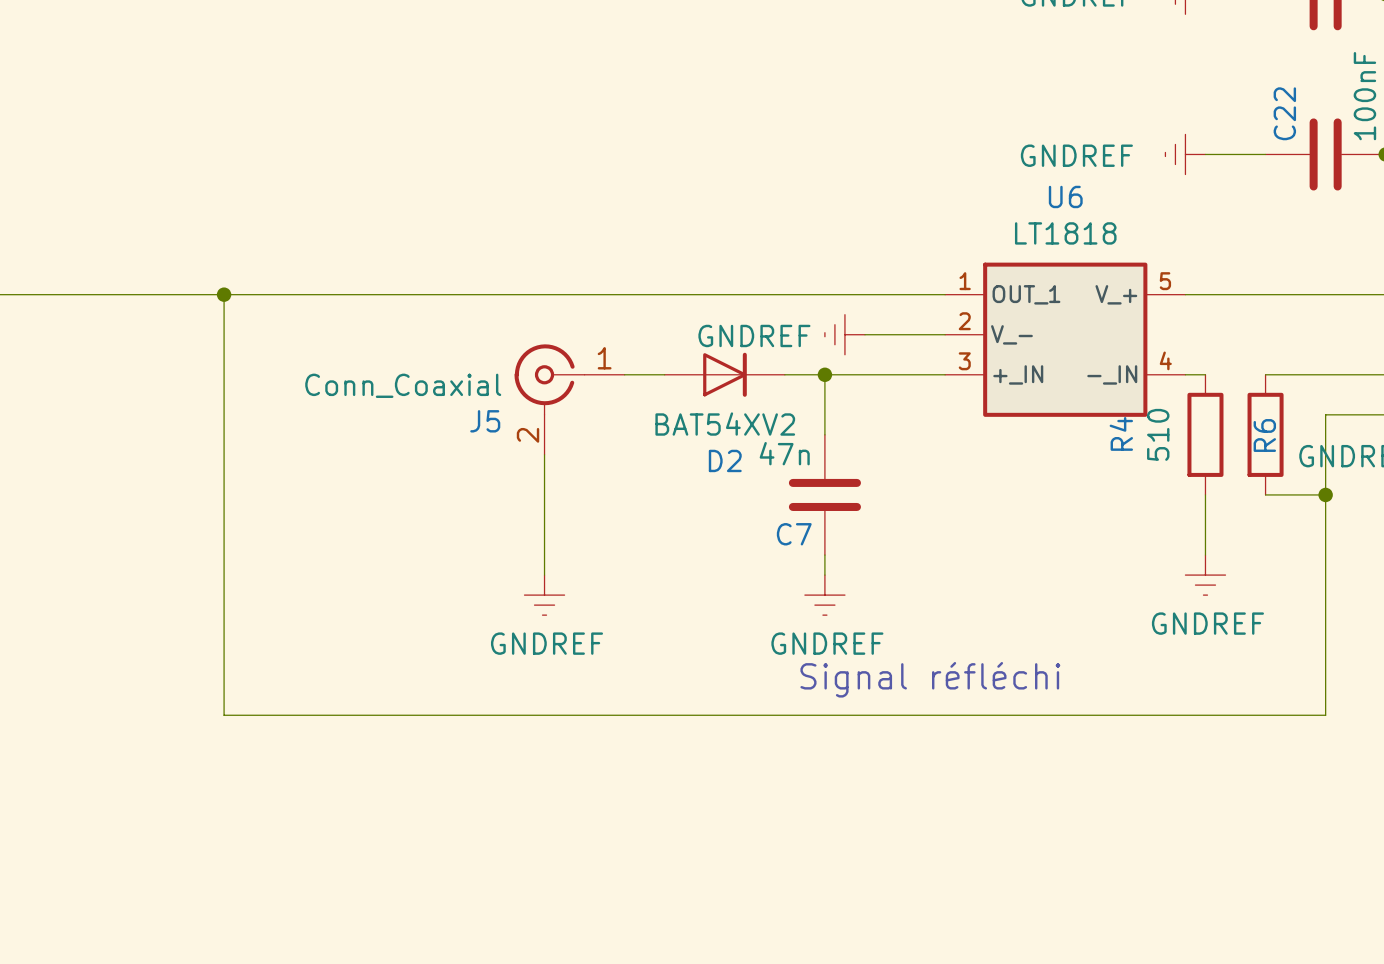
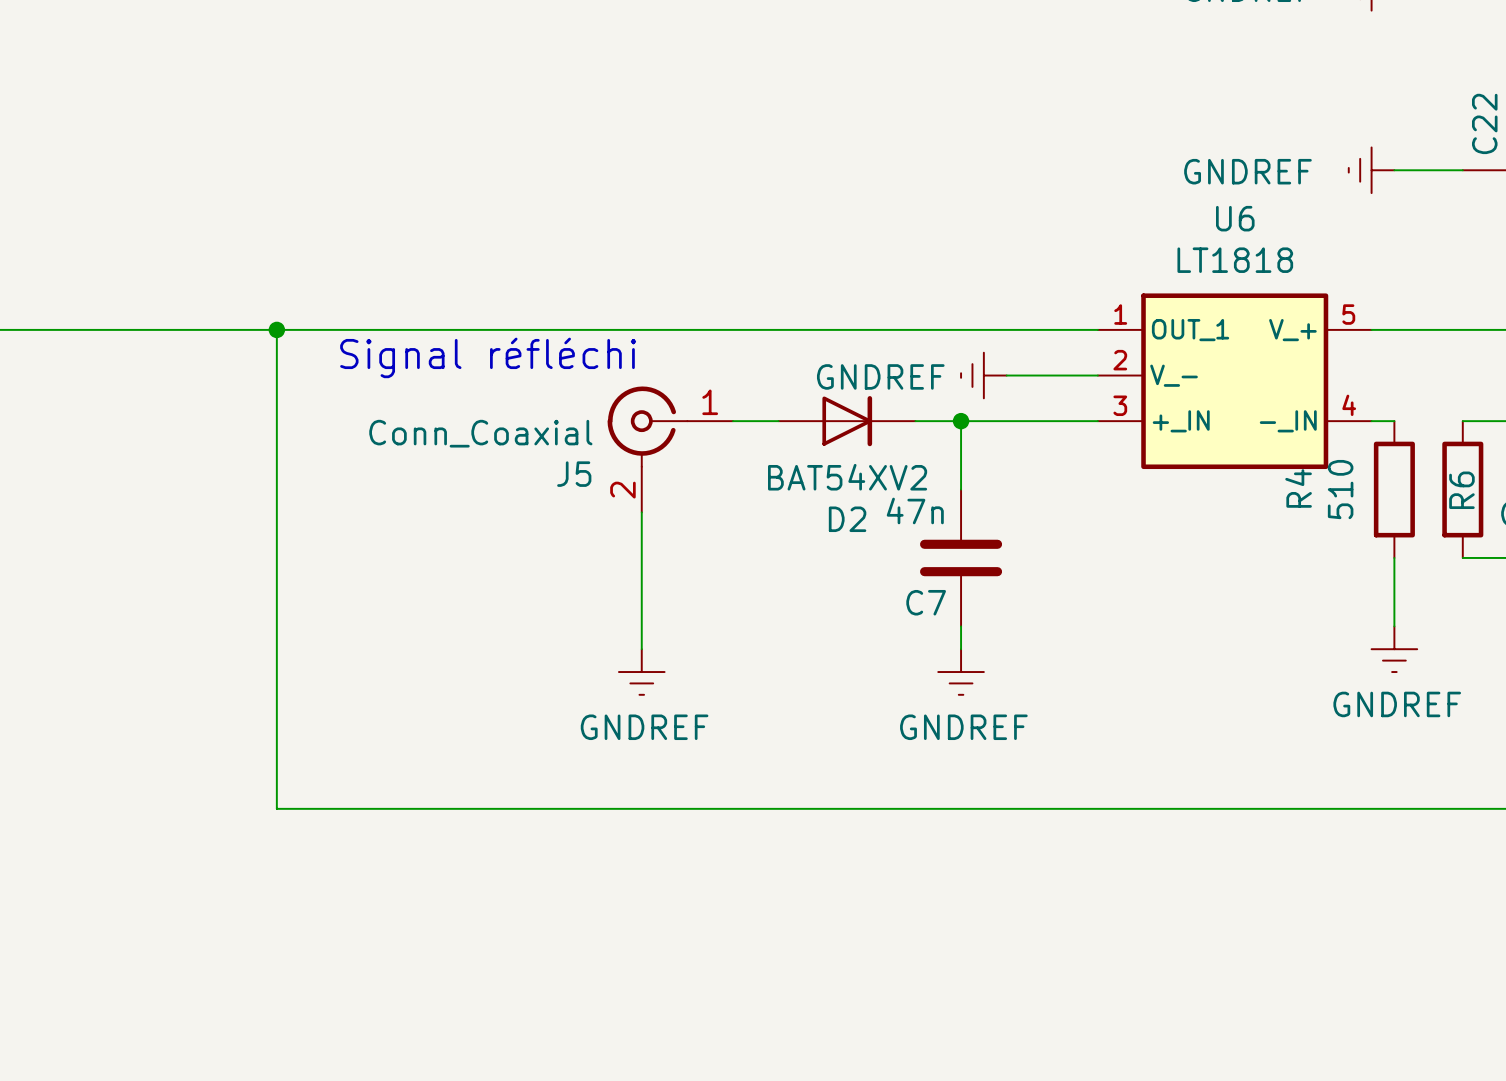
text: none -> Signal réfléchi (488, 357)
text: Signal réfléchi (930, 679) -> none

